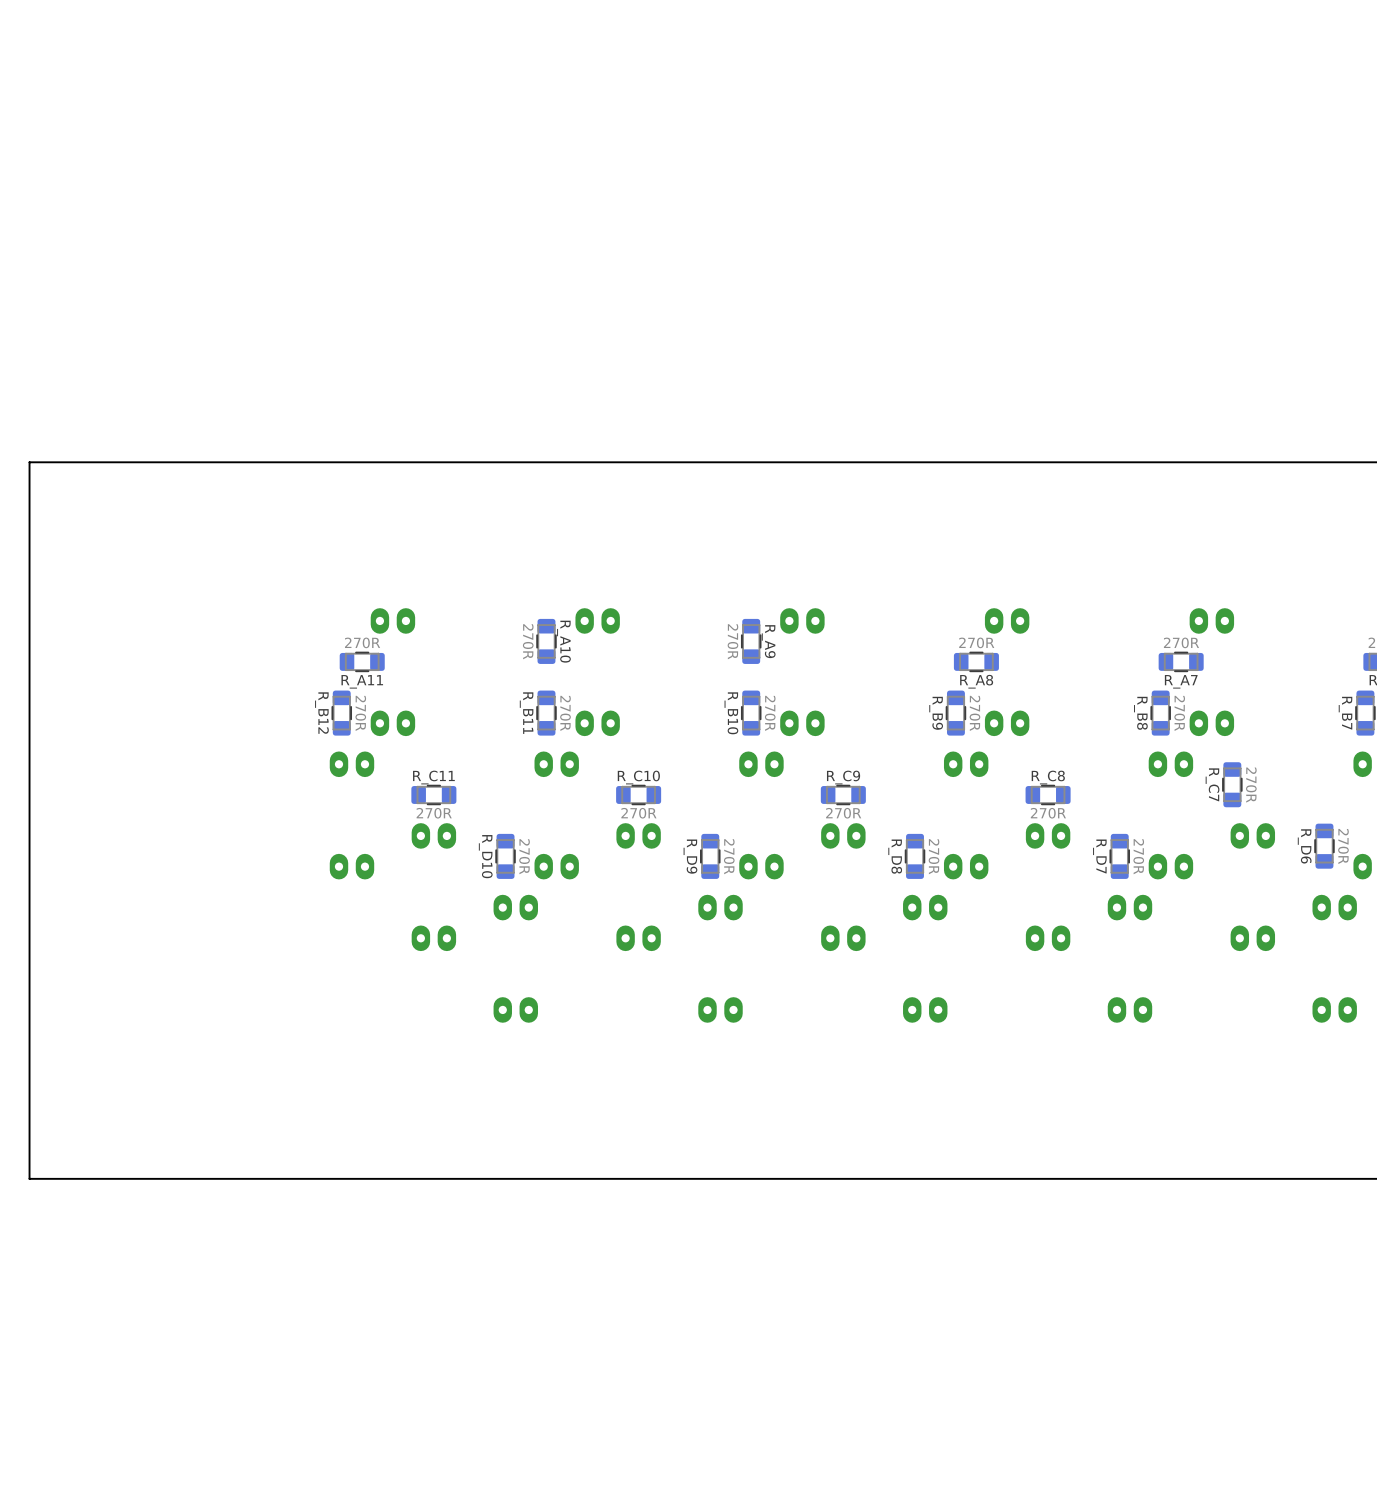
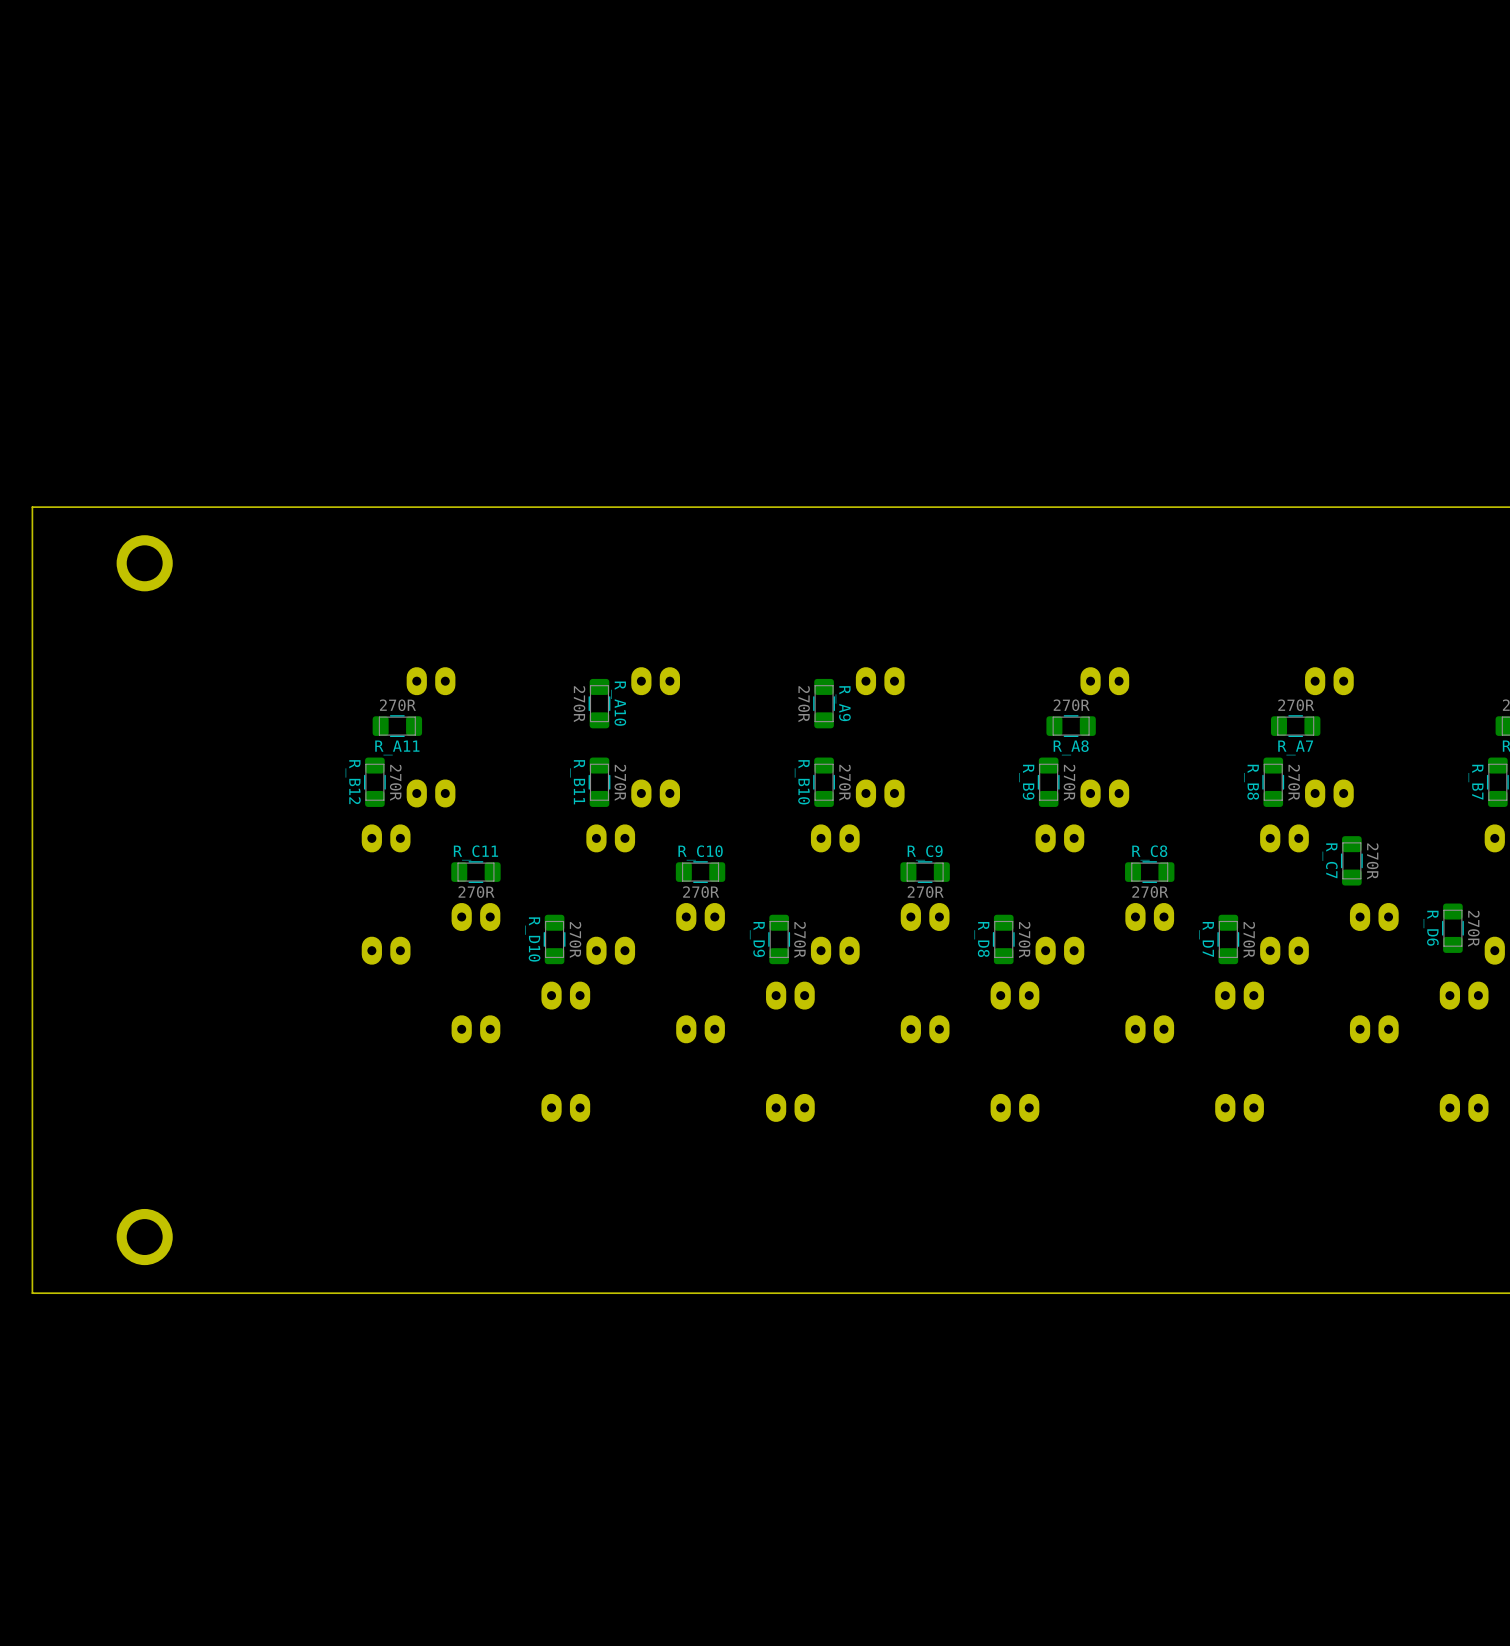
part: none -> (144, 563)
part: none -> (144, 1237)

